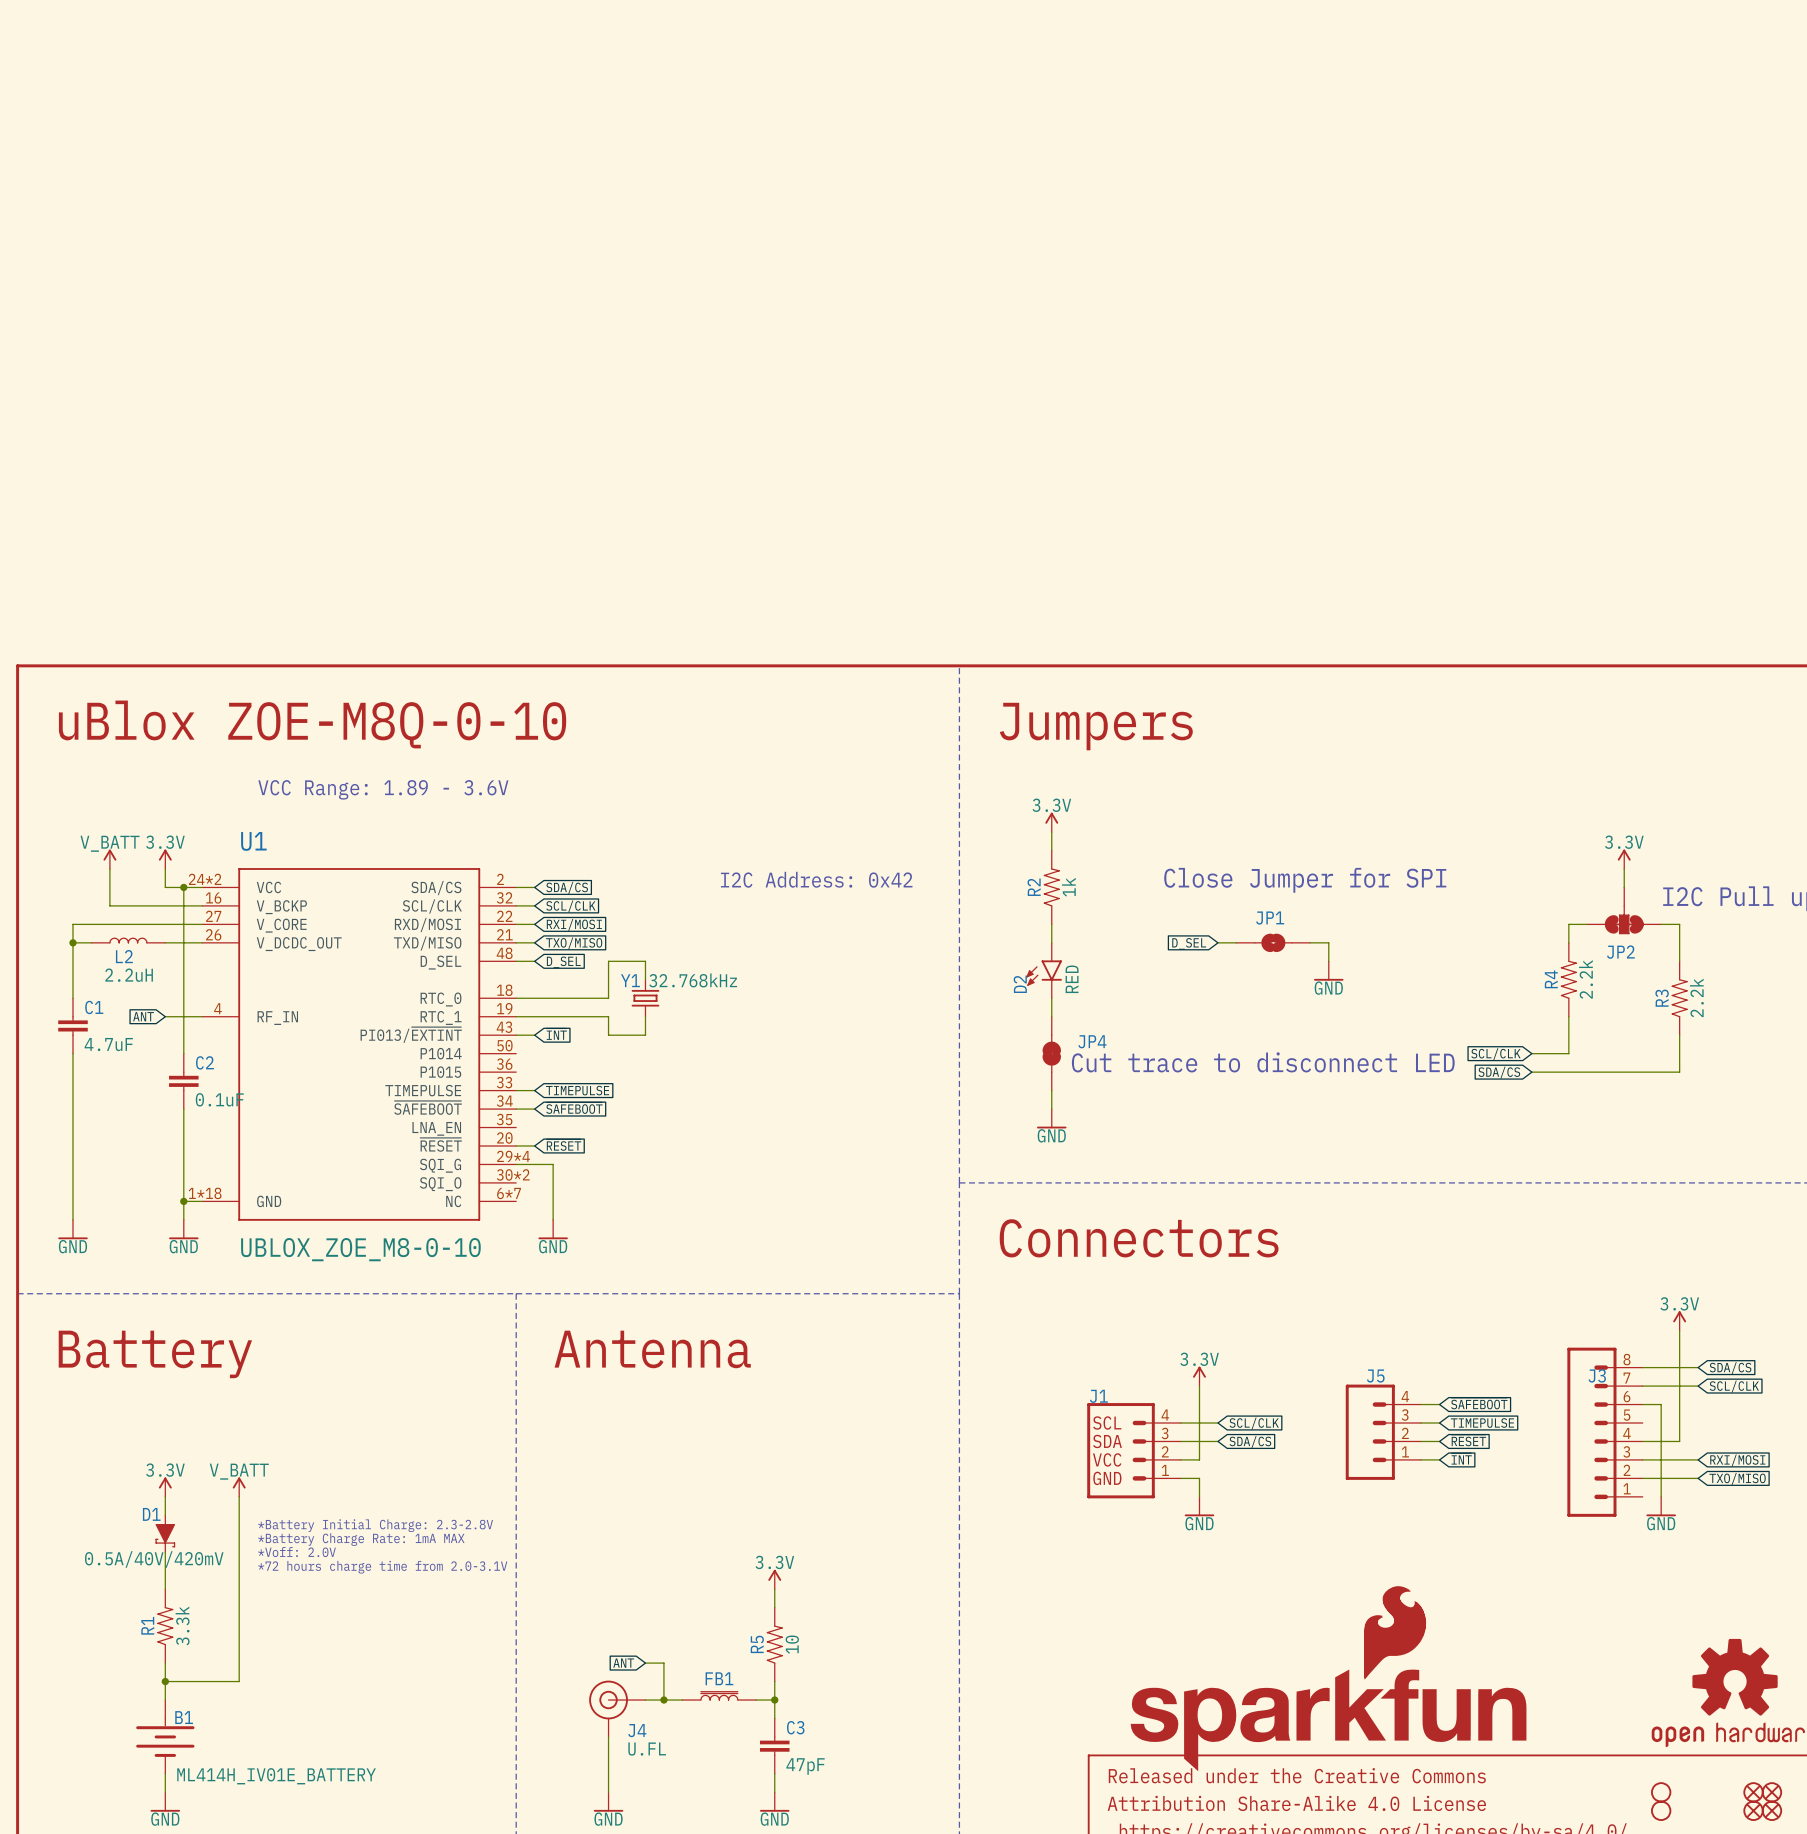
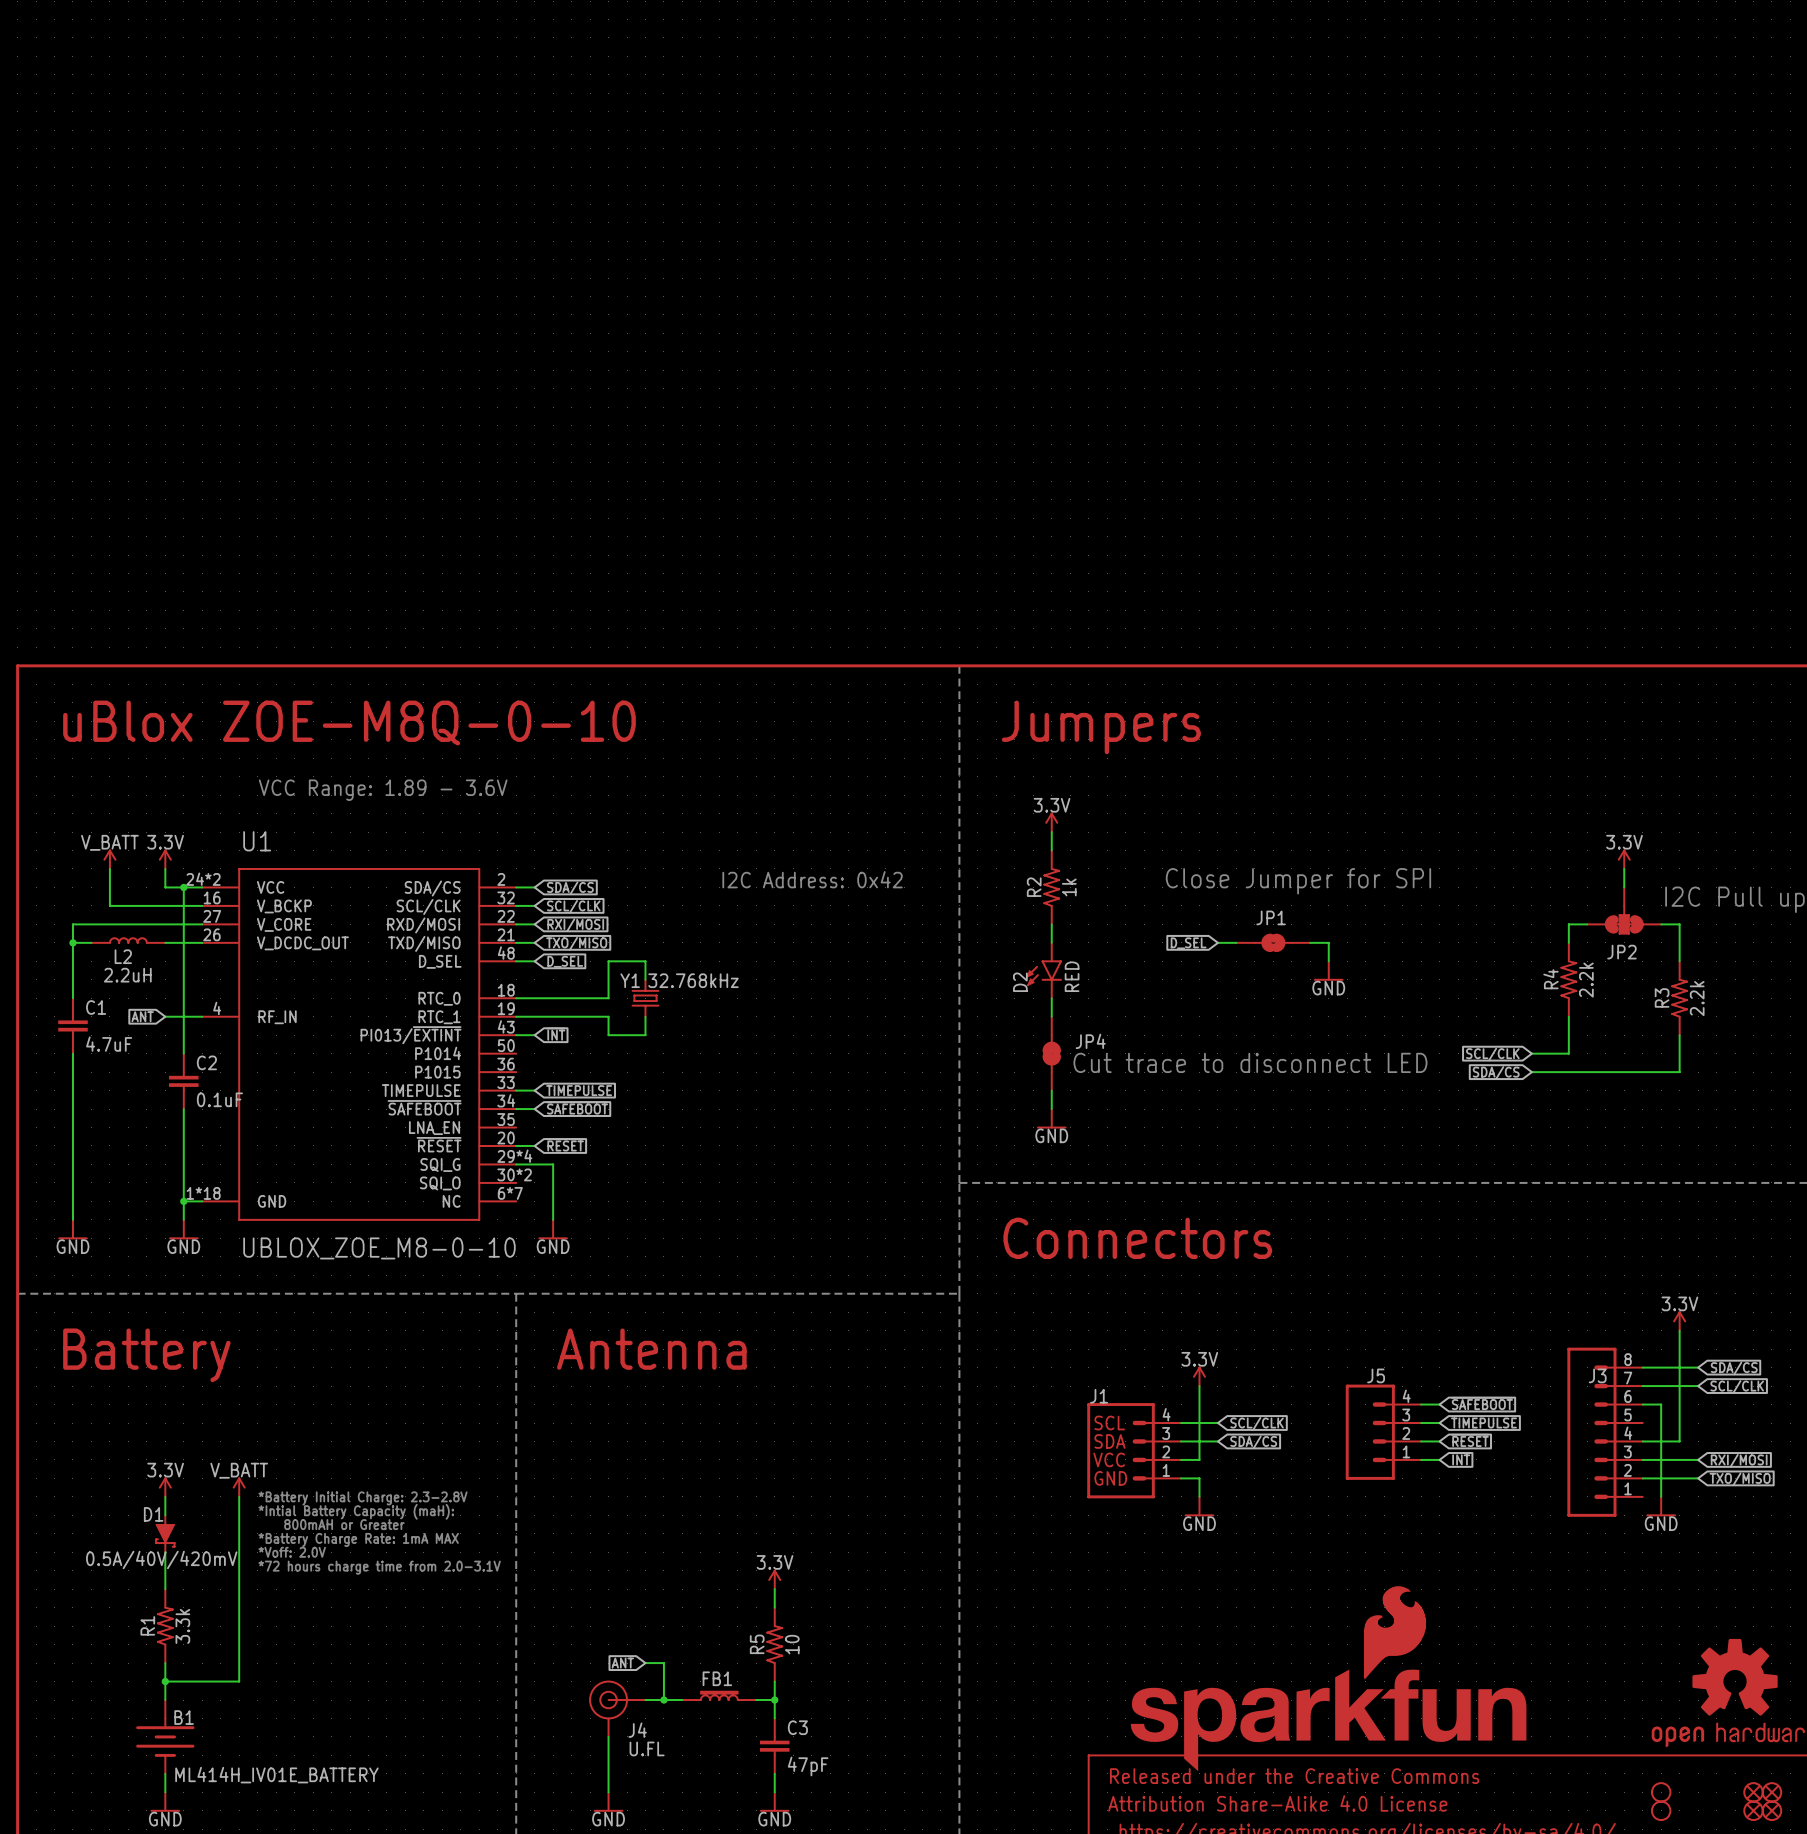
text: none -> *Battery Initial Charge: 2.3-2.8V (363, 1498)
text: none -> *Intial Battery Capacity (maH): (356, 1511)
text: *Battery Initial Charge: 2.3-2.8V (375, 1525) -> 800mAH or Greater (344, 1524)

